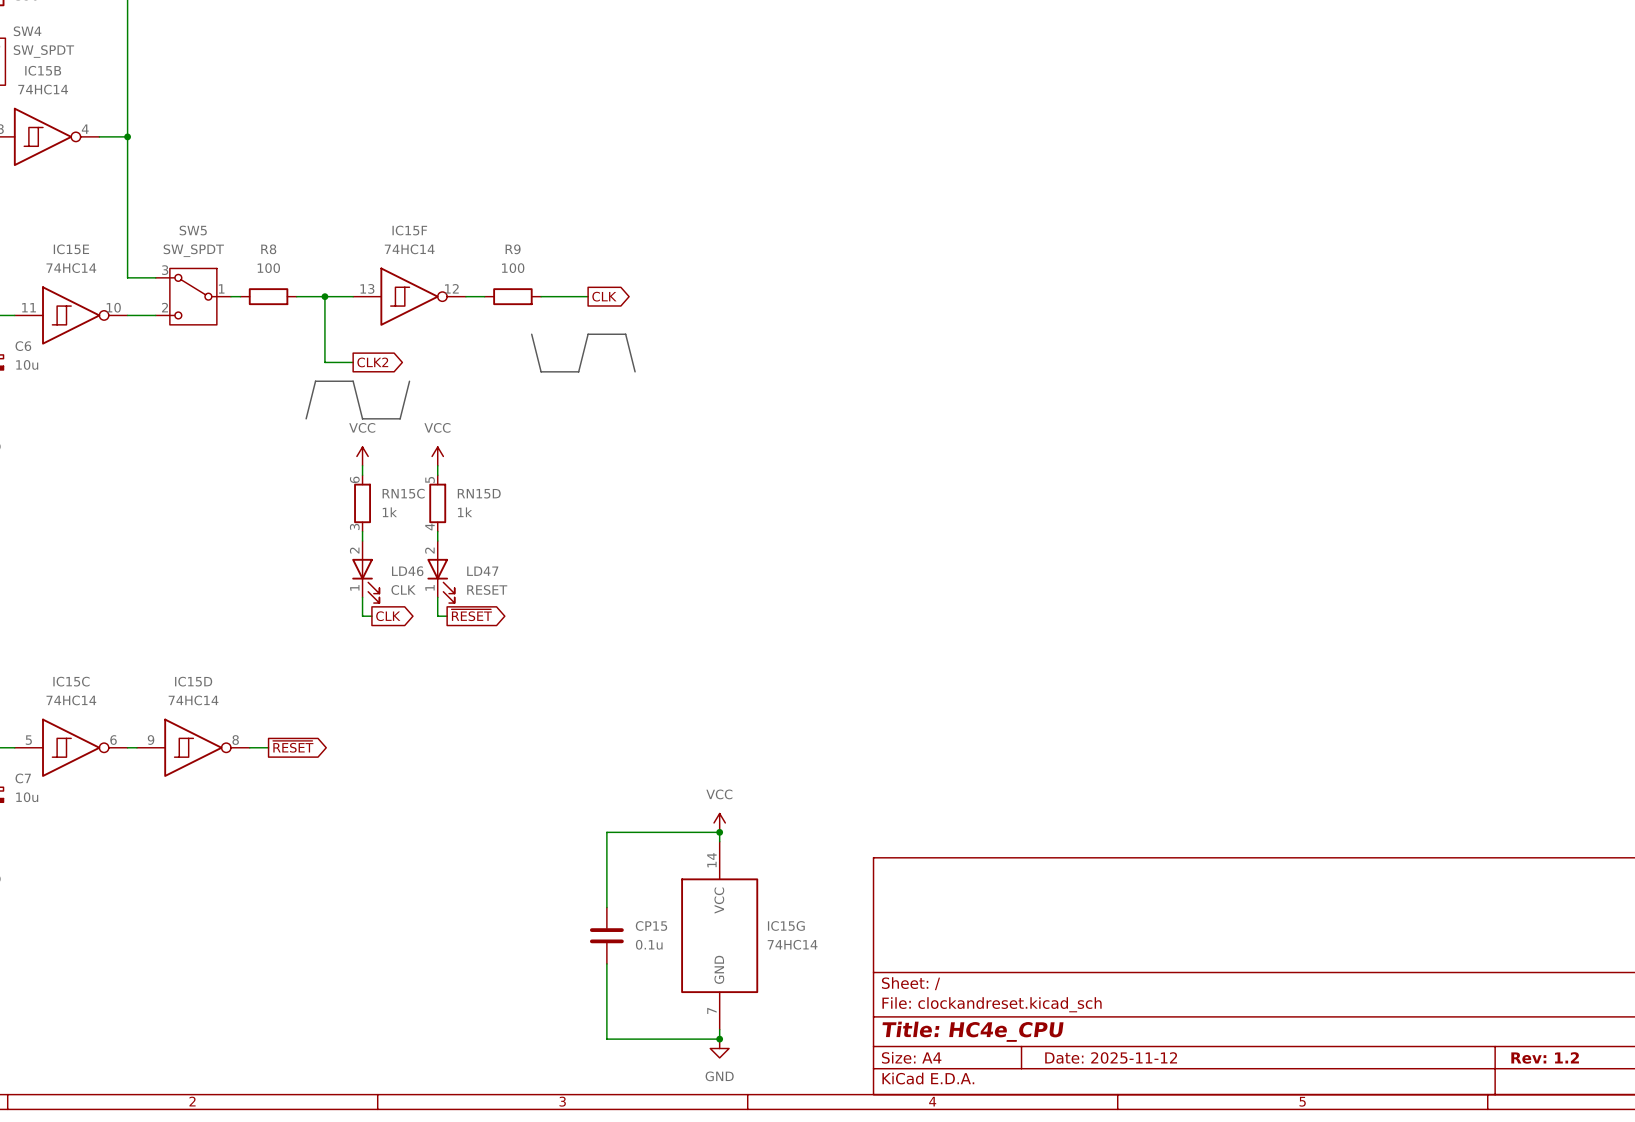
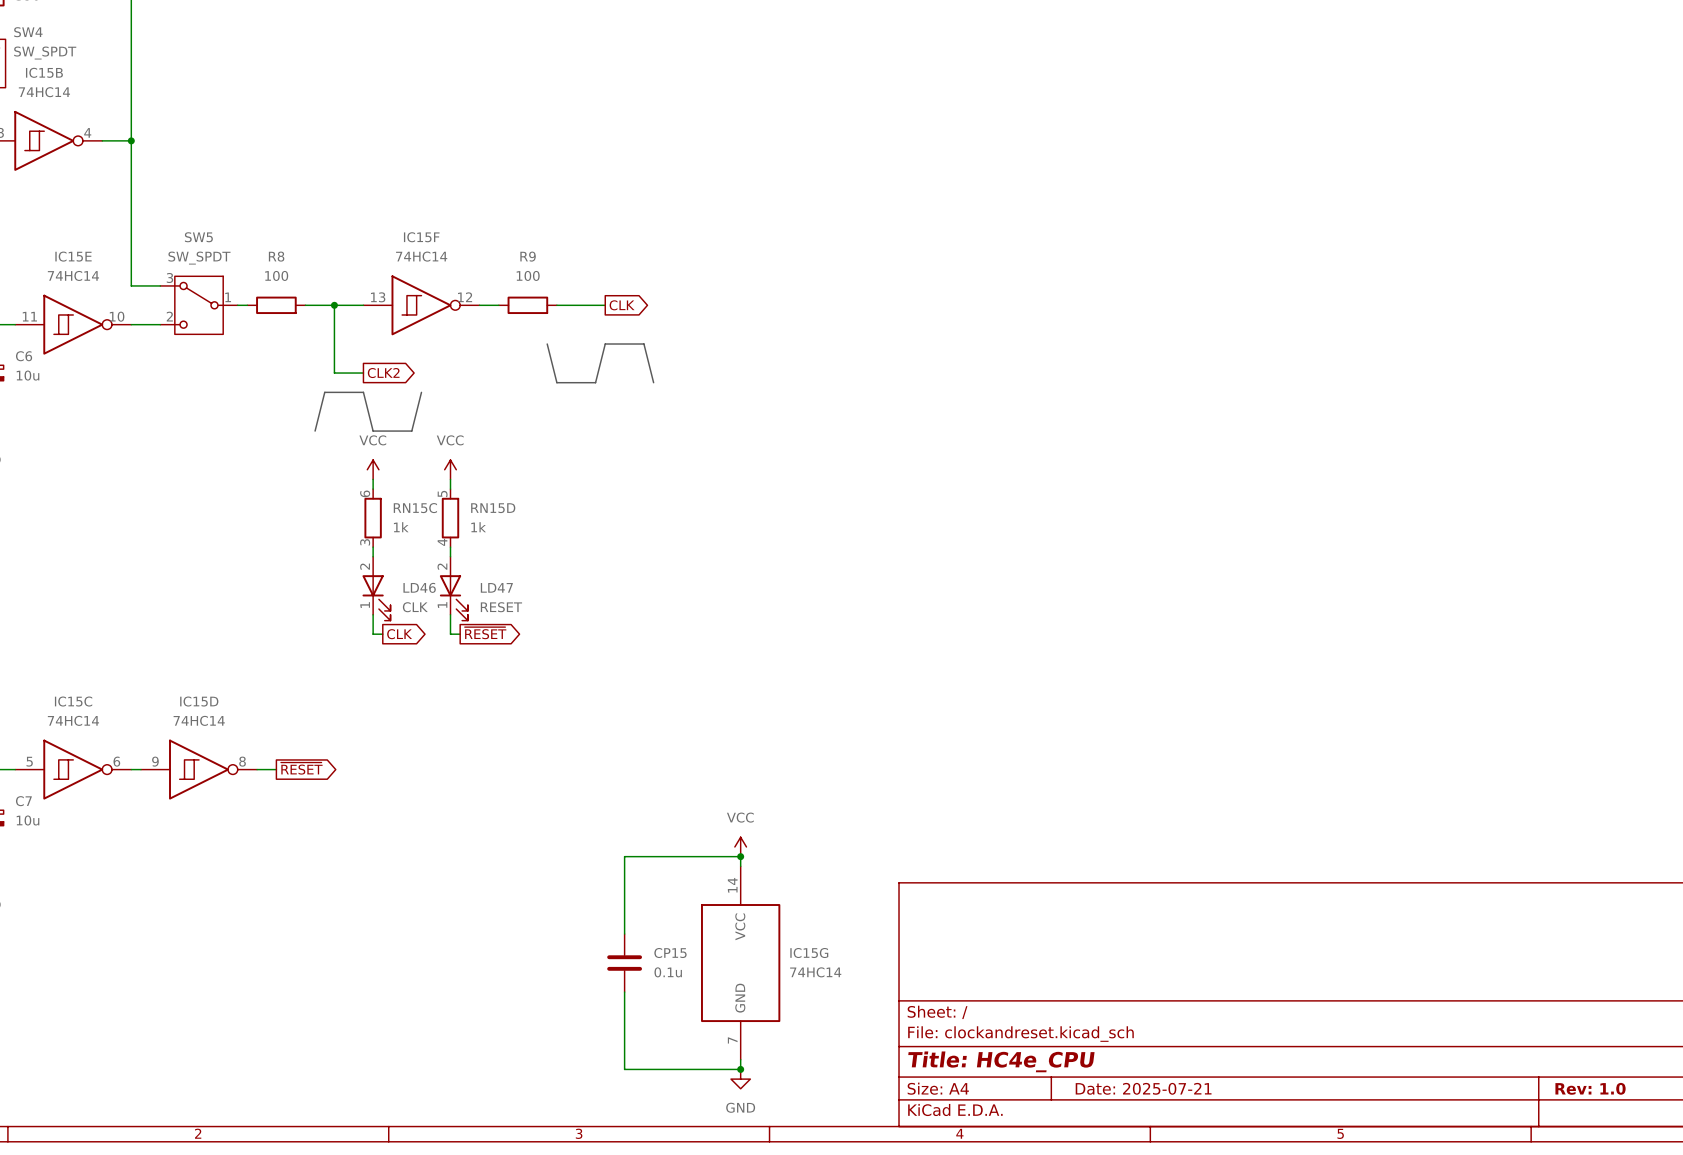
title block: Date: 2025-11-12 (1111, 1057) -> Date: 2025-07-21 (1143, 1088)
title block: Rev: 1.2 (1545, 1057) -> Rev: 1.0 (1590, 1088)

